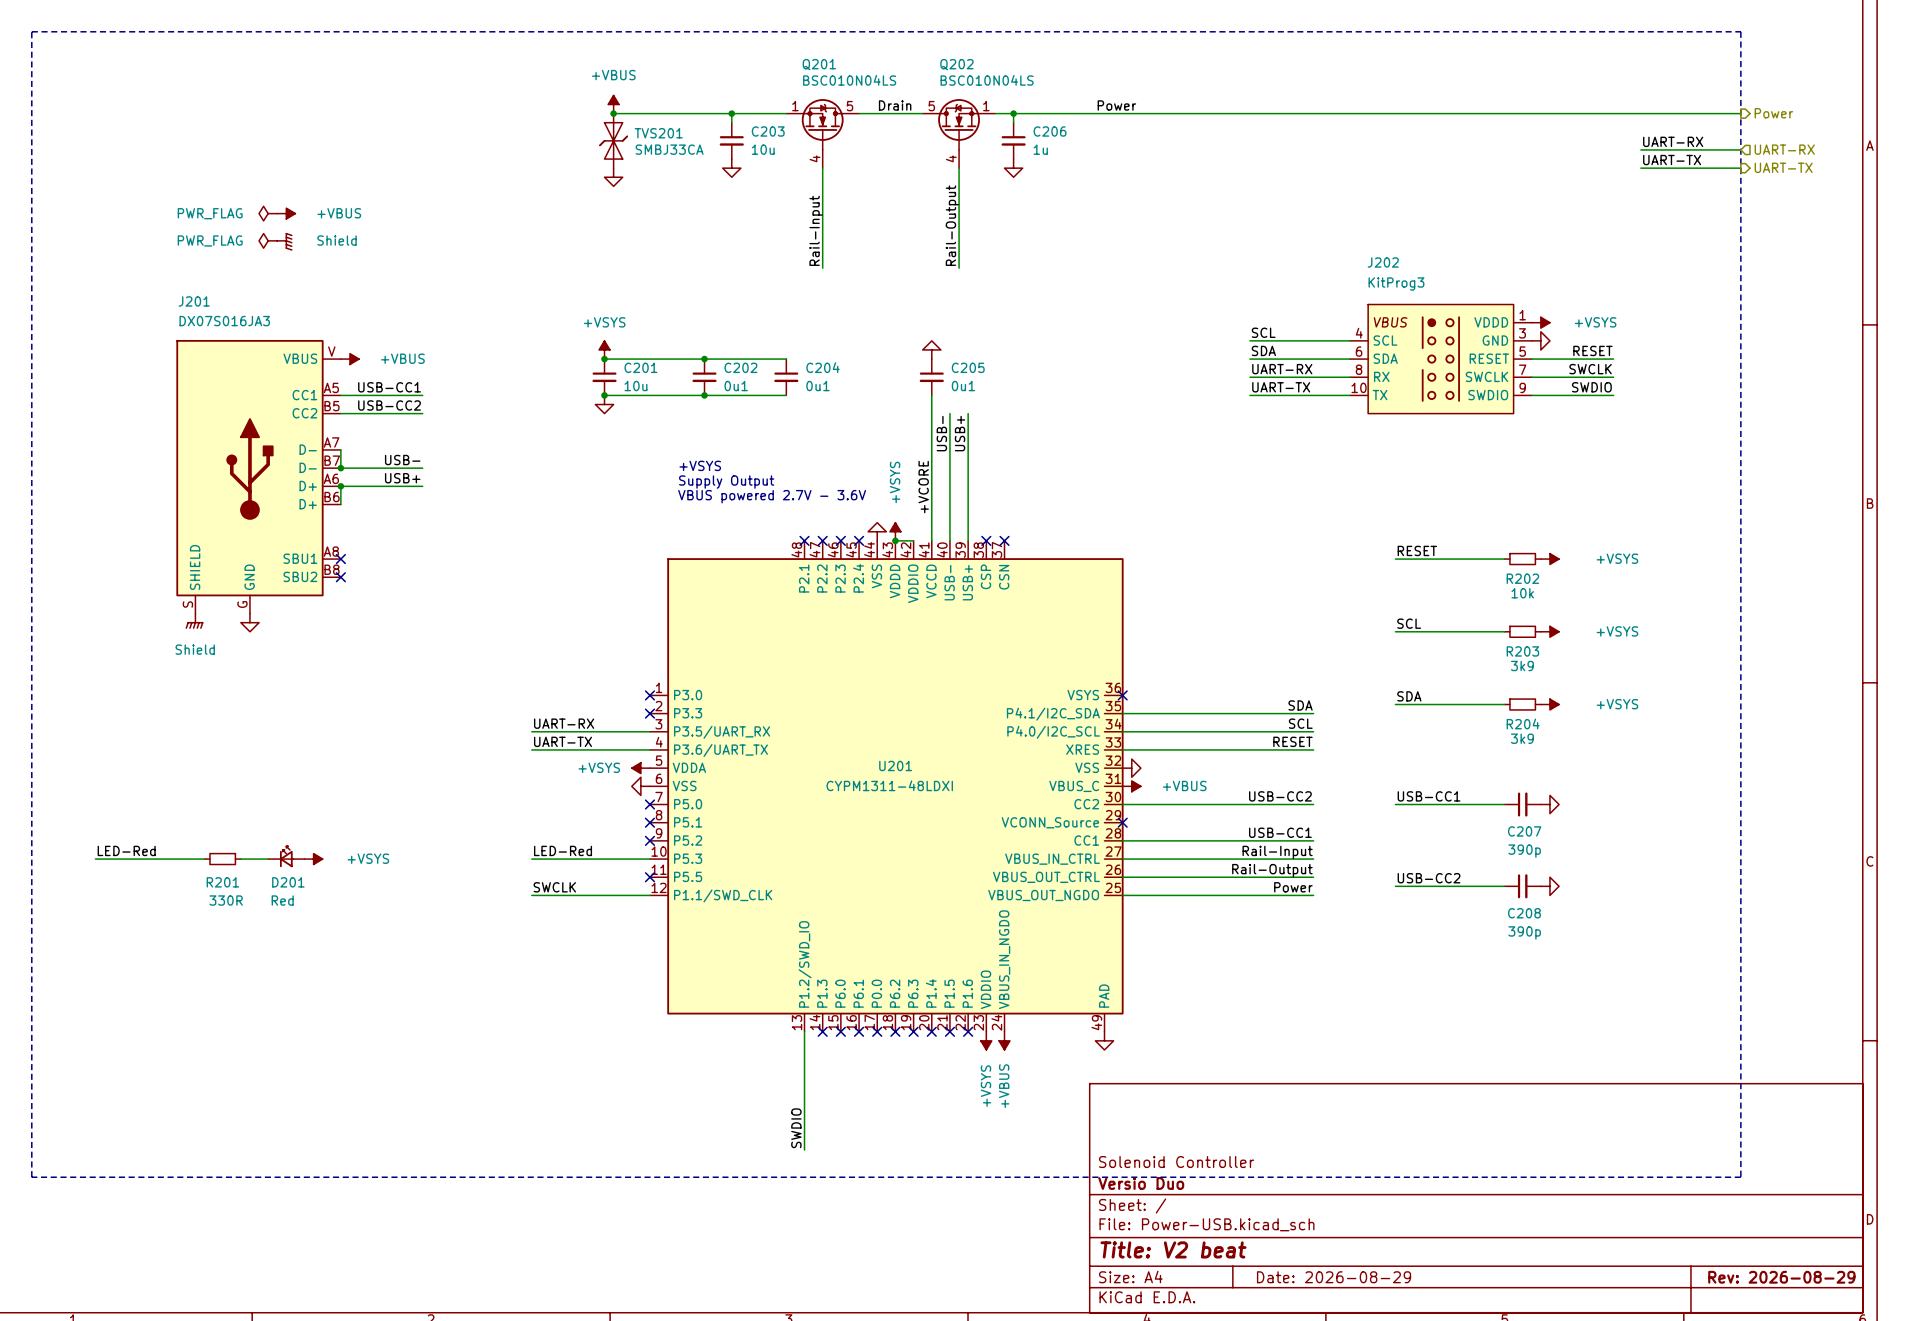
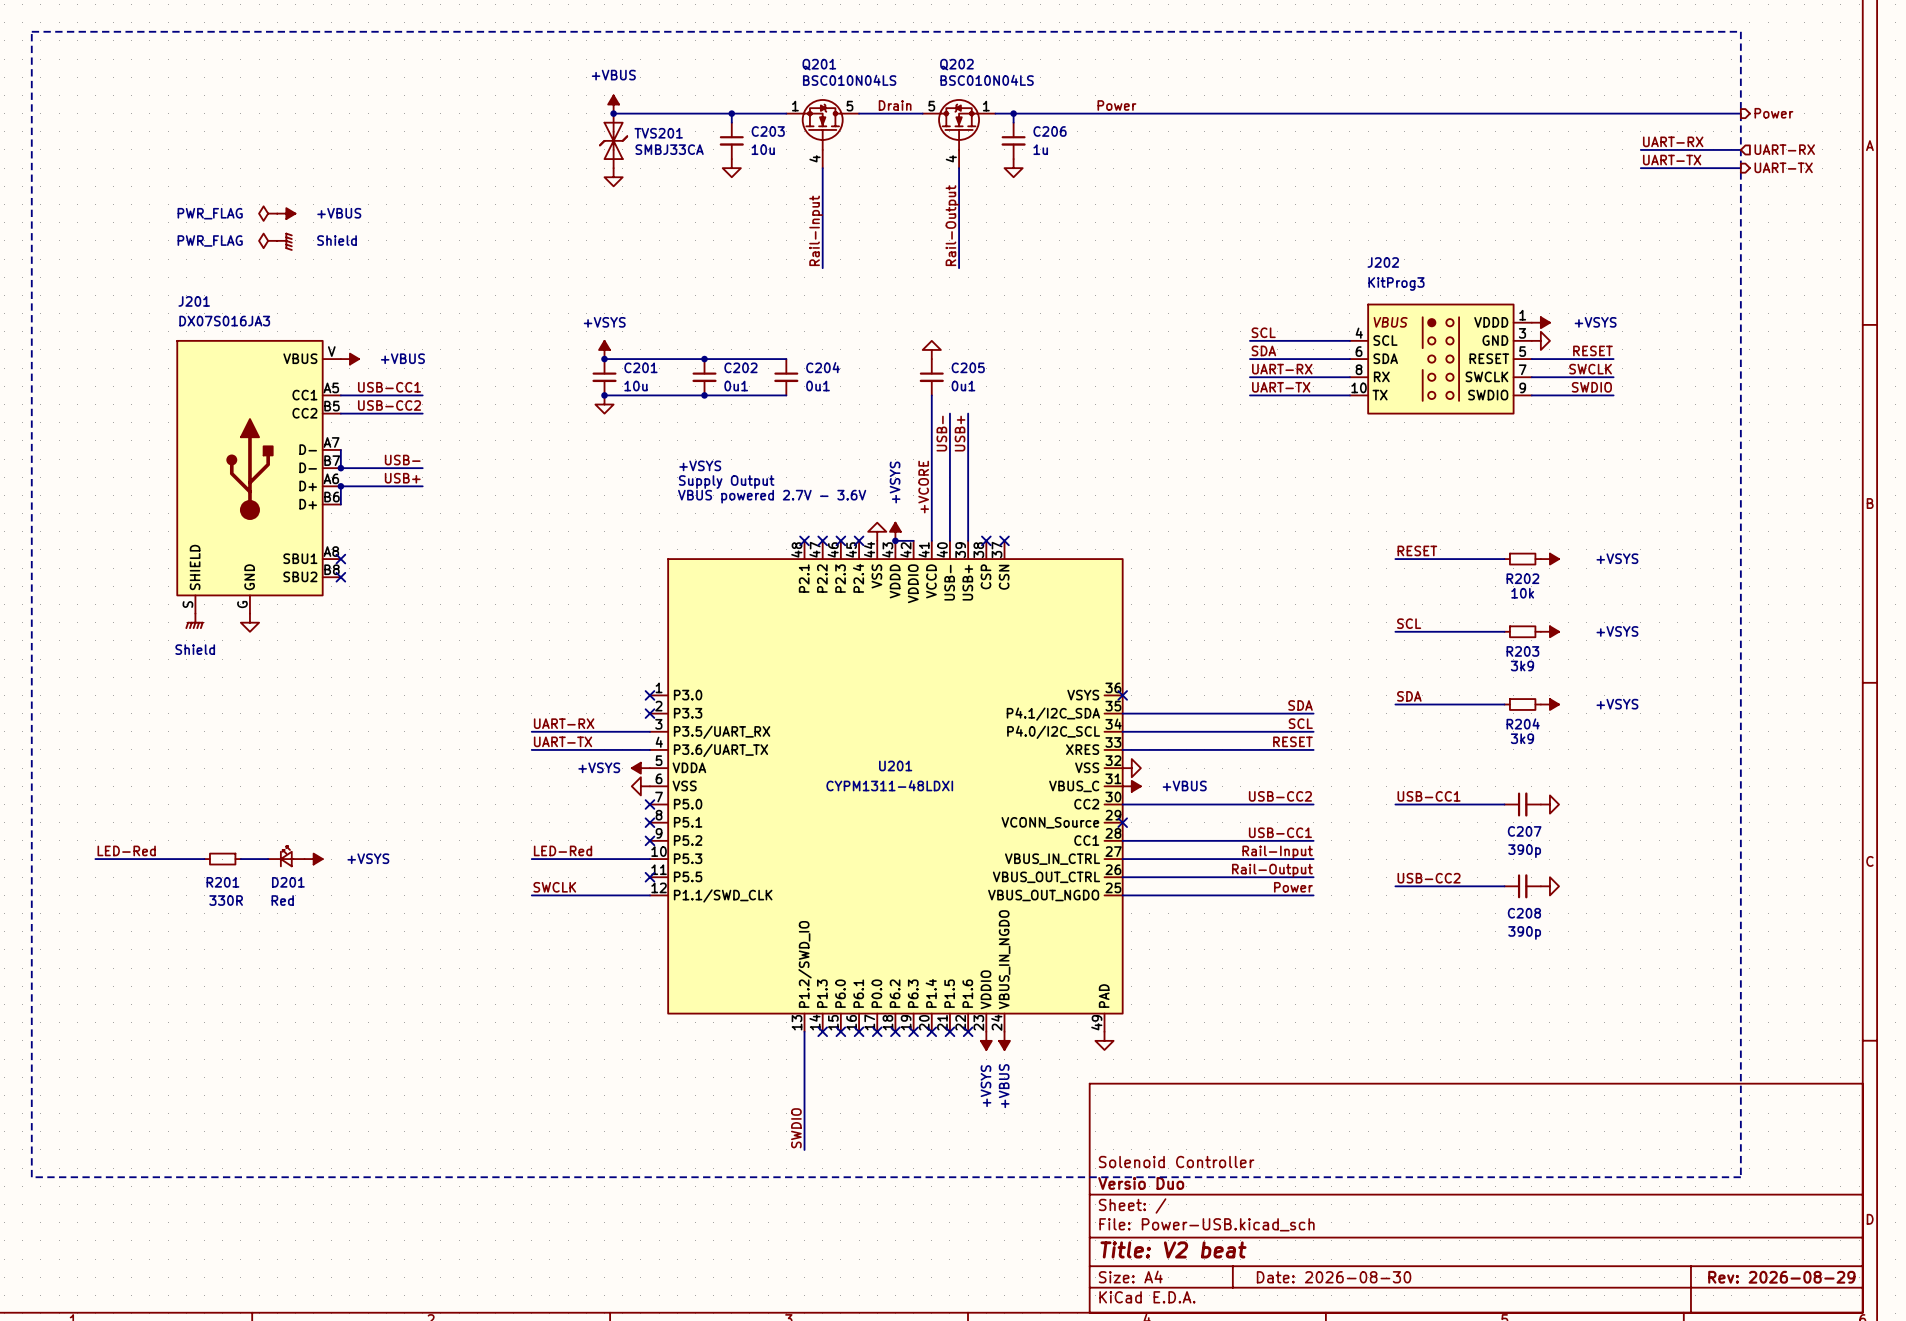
title block: Date: 2026-08-29 (1334, 1277) -> Date: 2026-08-30 (1334, 1277)

